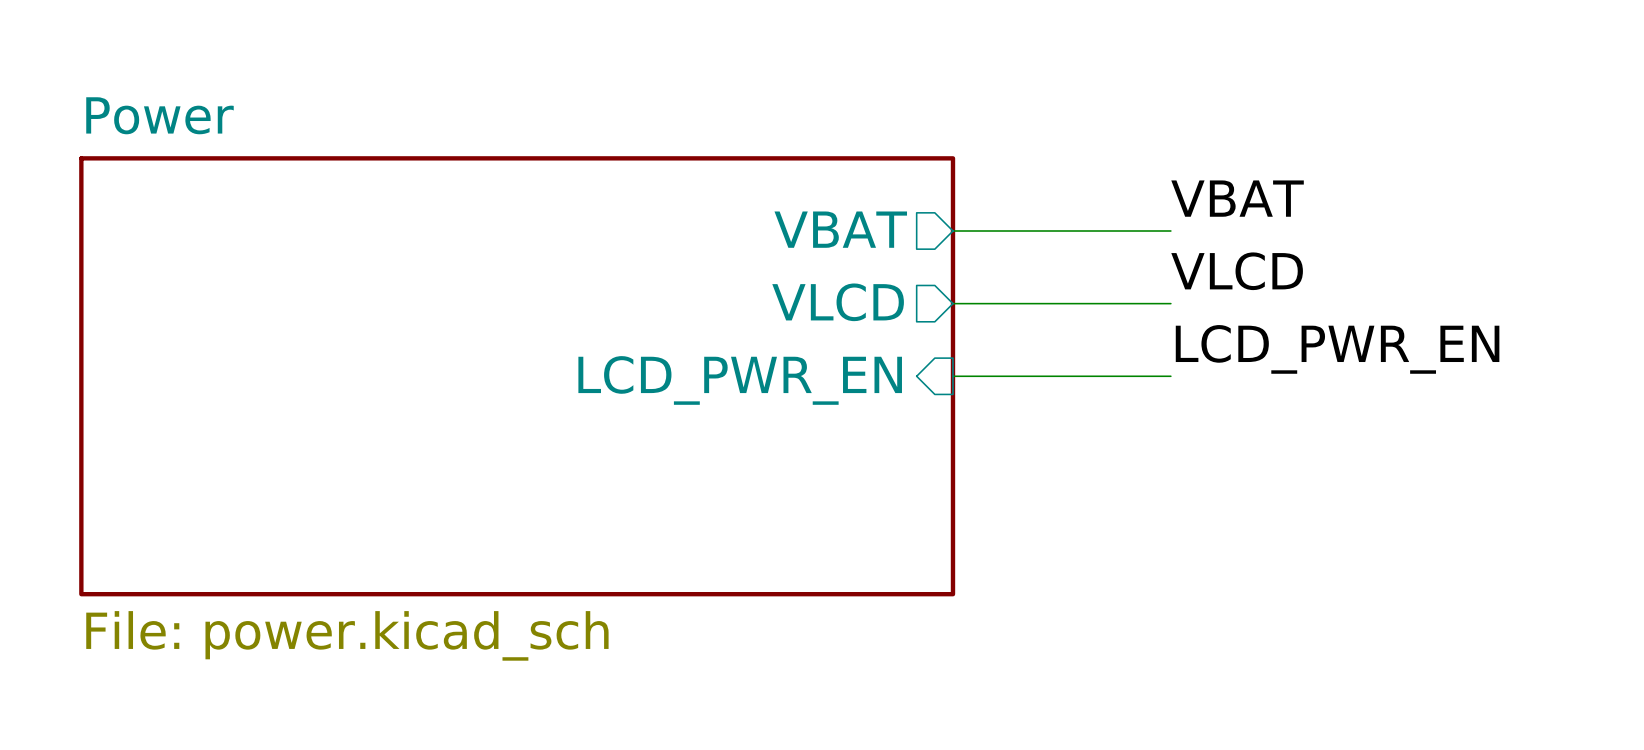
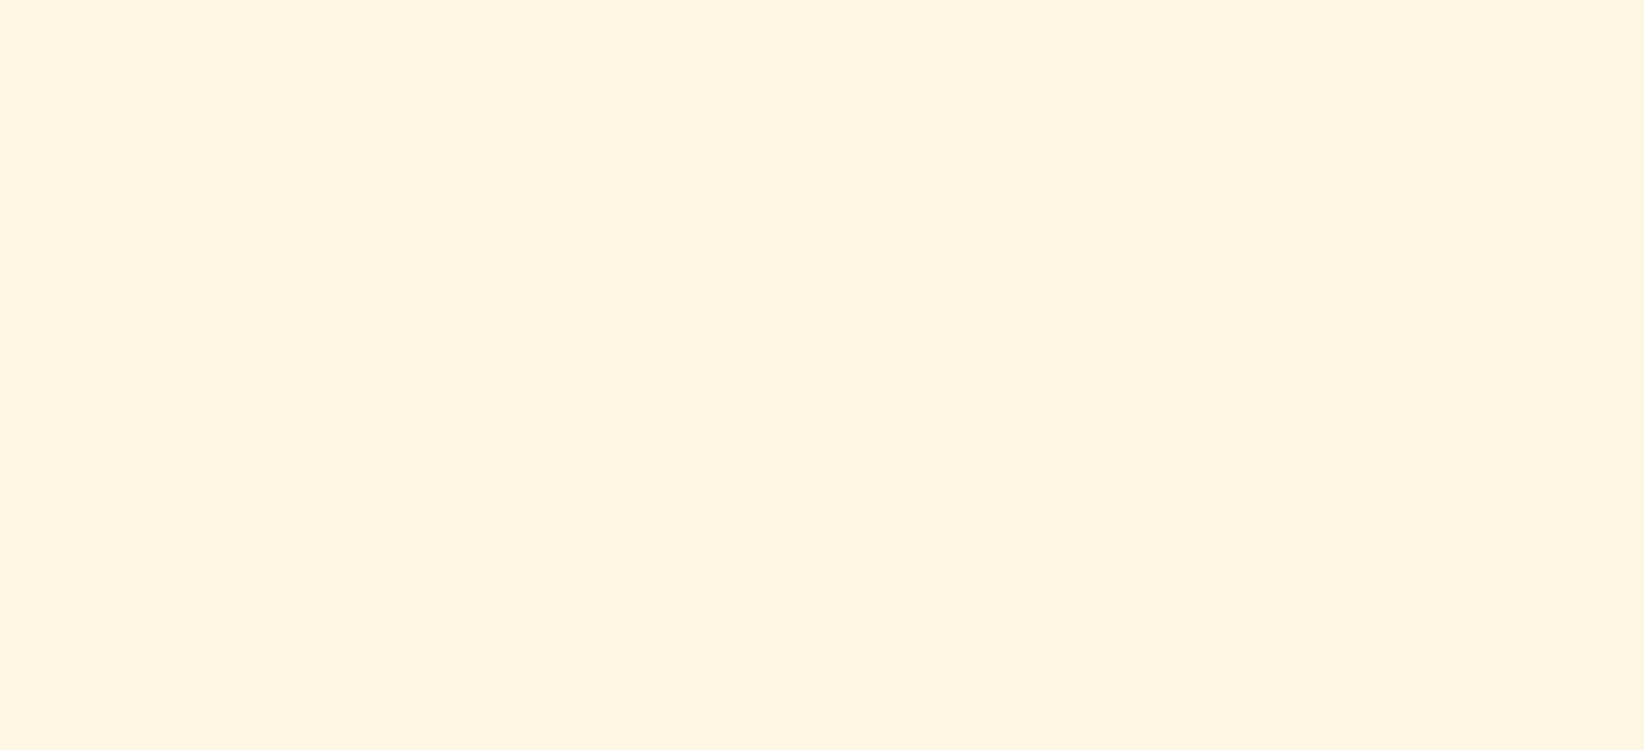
label: VBAT (1237, 198) -> none
sheet pin: VBAT (840, 229) -> none
wire: (952, 231) (1170, 231) -> none
label: VLCD (1237, 271) -> none
sheet pin: VLCD (838, 302) -> none
wire: (952, 303) (1170, 303) -> none
label: LCD_PWR_EN (1337, 349) -> none
sheet Power: File: power.kicad_sch (517, 376) -> none
wire: (952, 376) (1170, 376) -> none
sheet pin: LCD_PWR_EN (740, 380) -> none

